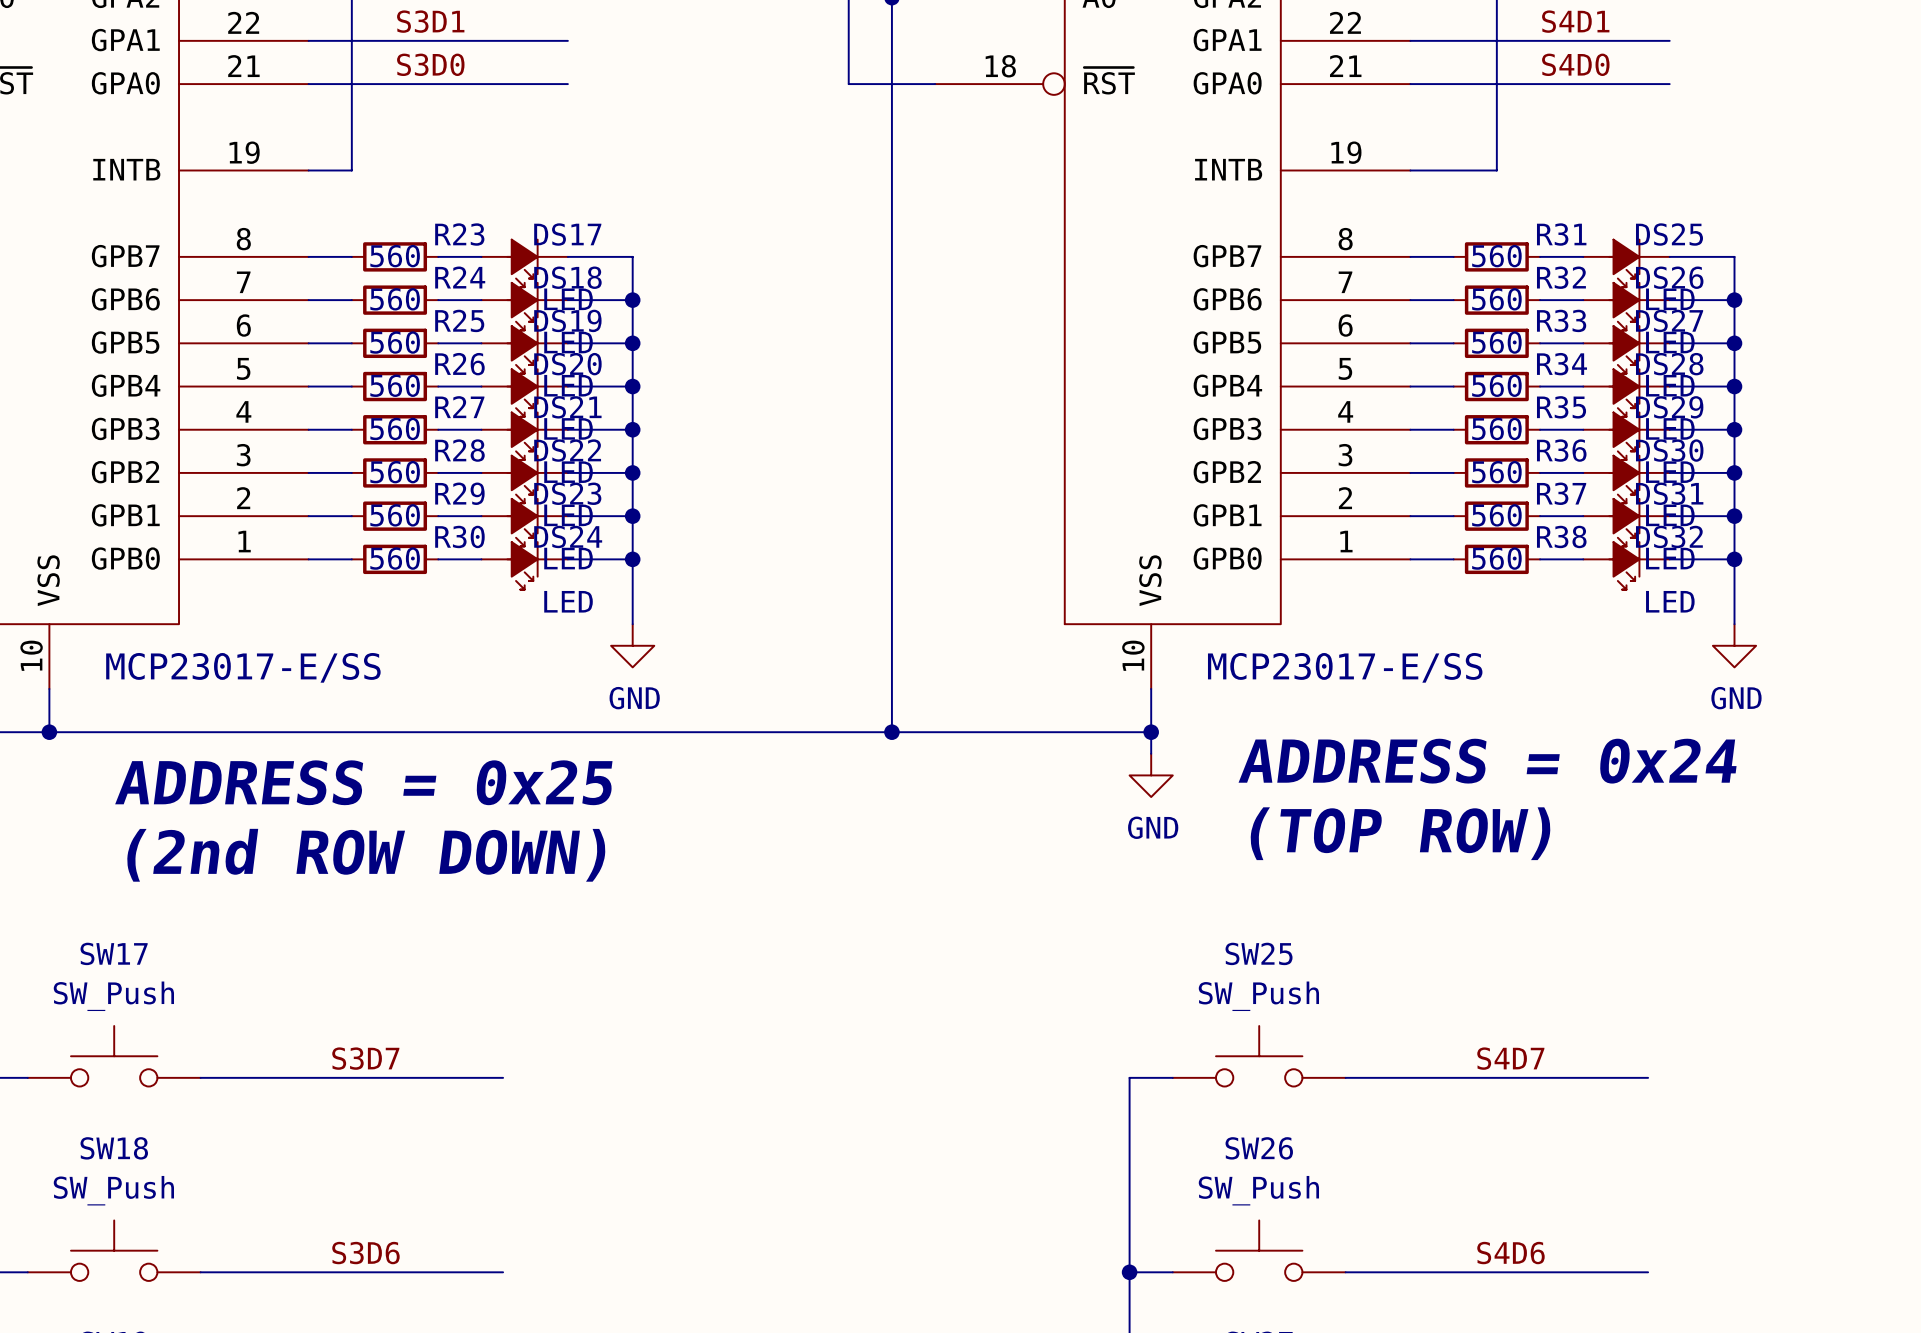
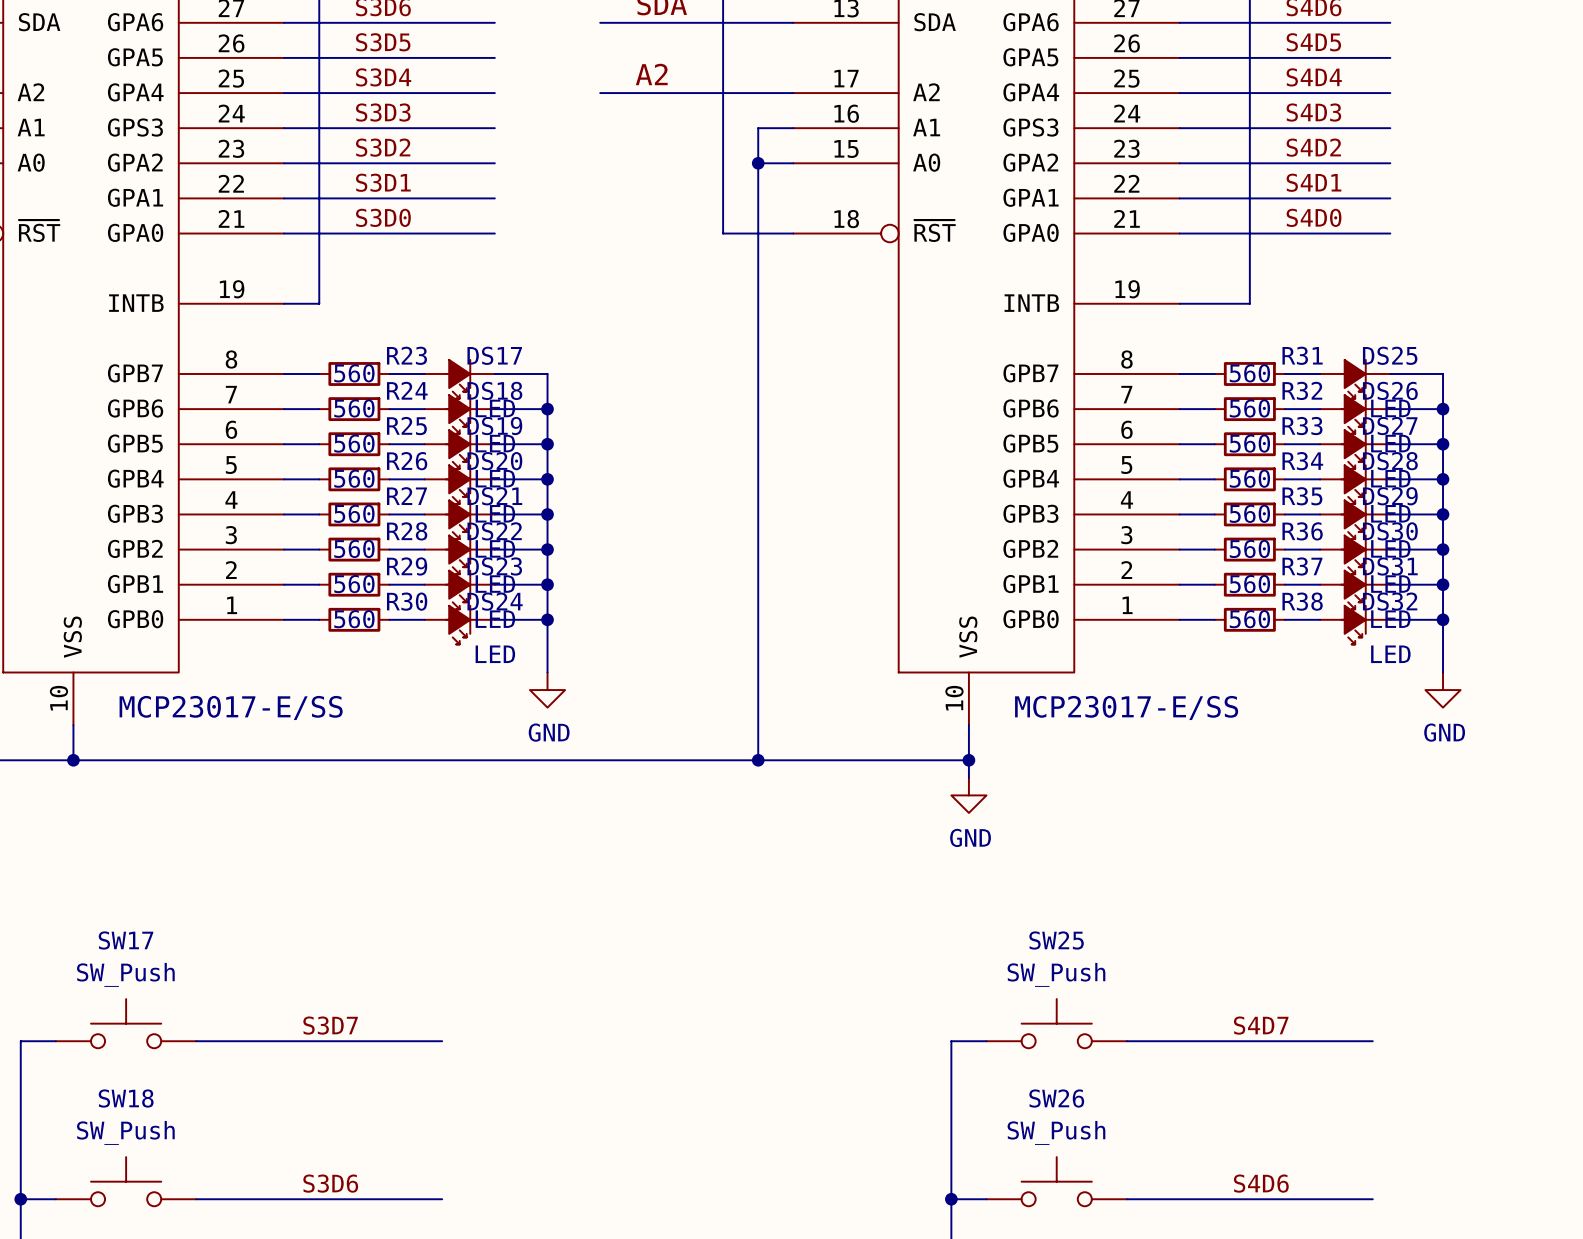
text: ADDRESS = 0x24 (1487, 761) -> none
text: ADDRESS = 0x25 (363, 782) -> none
text: (TOP ROW) (1400, 833) -> none
text: (2nd ROW DOWN) (366, 855) -> none

